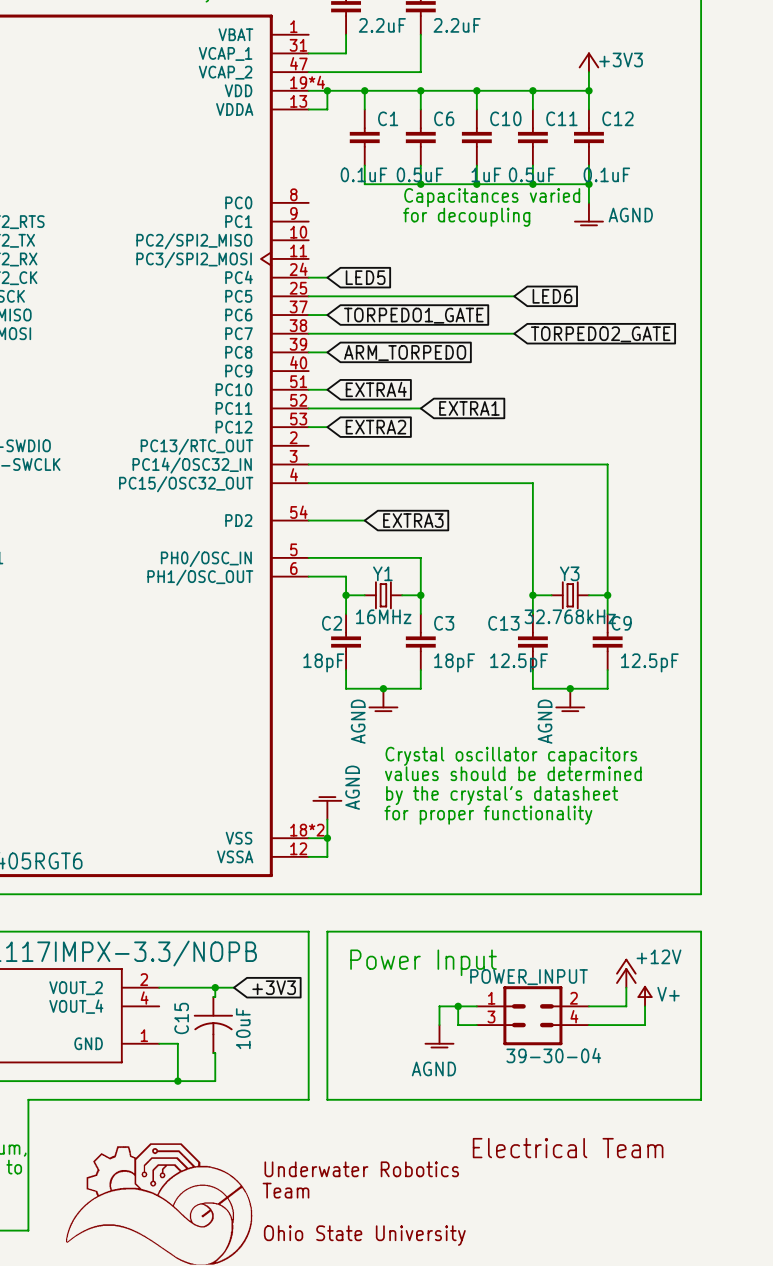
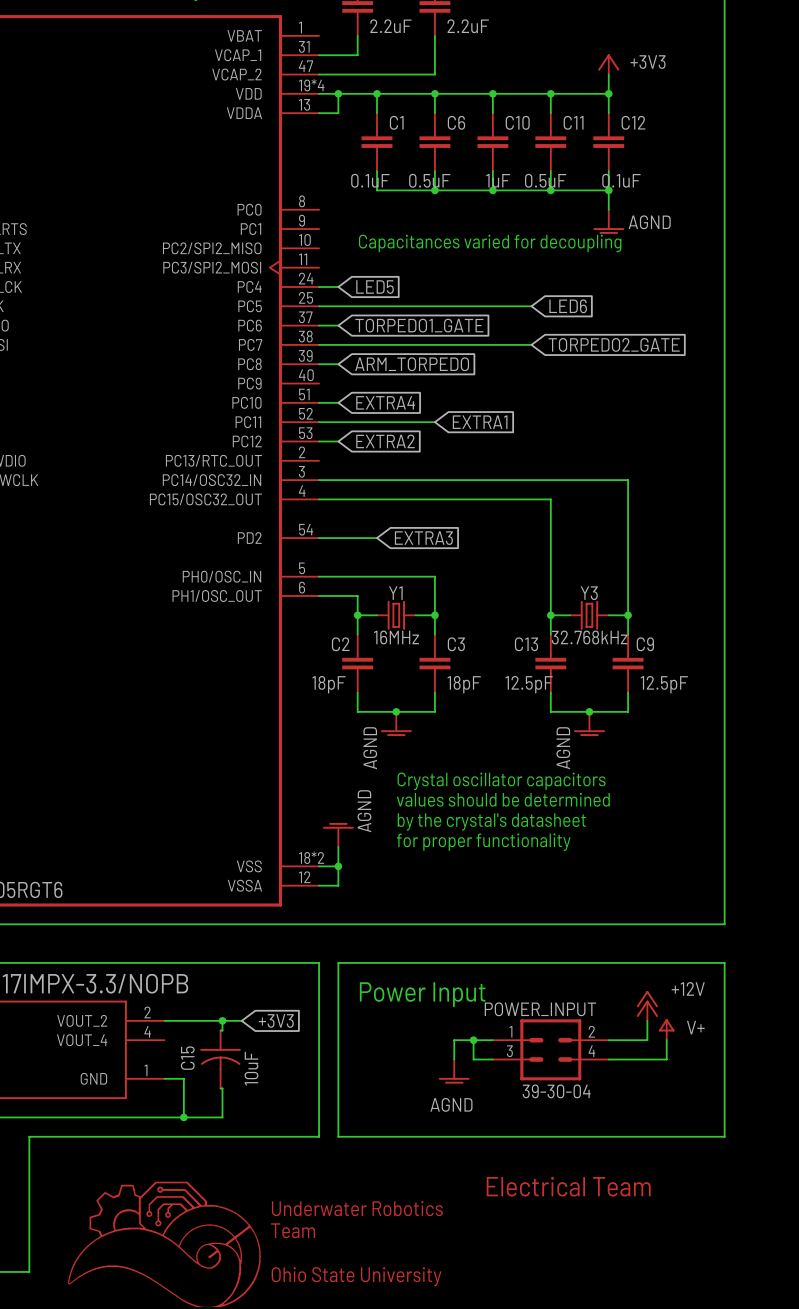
text: Capacitances varied (492, 197) -> none
text: for decoupling (466, 217) -> none
text: none -> Capacitances varied for decoupling (490, 243)

